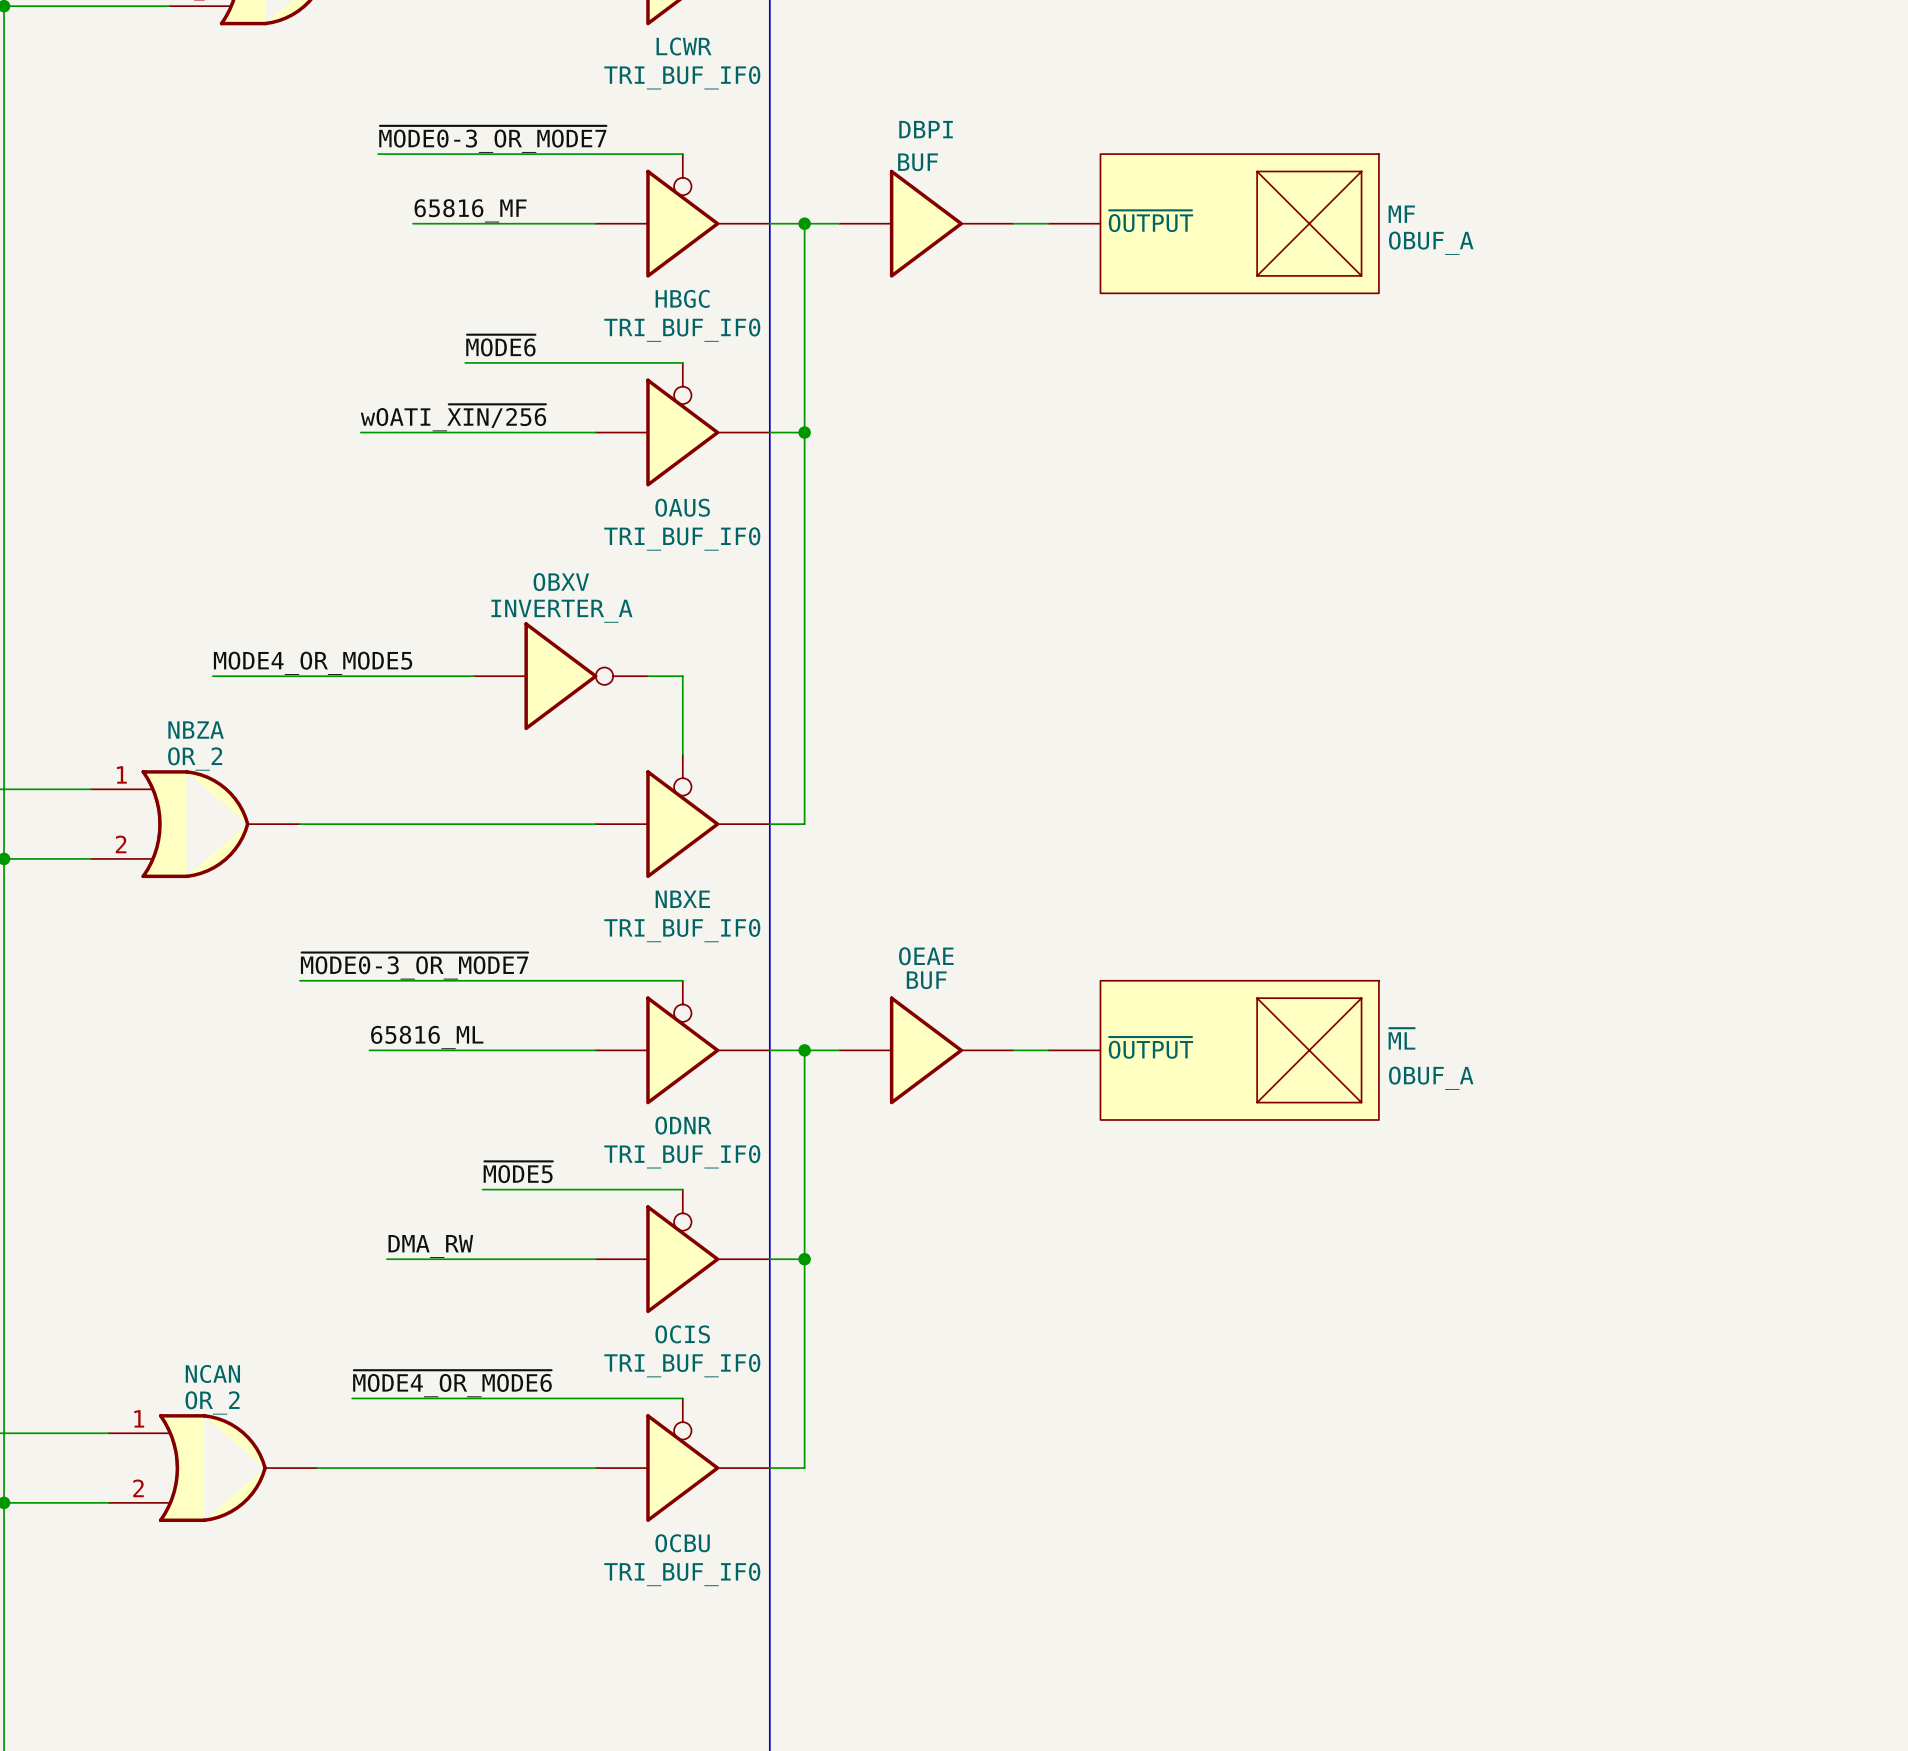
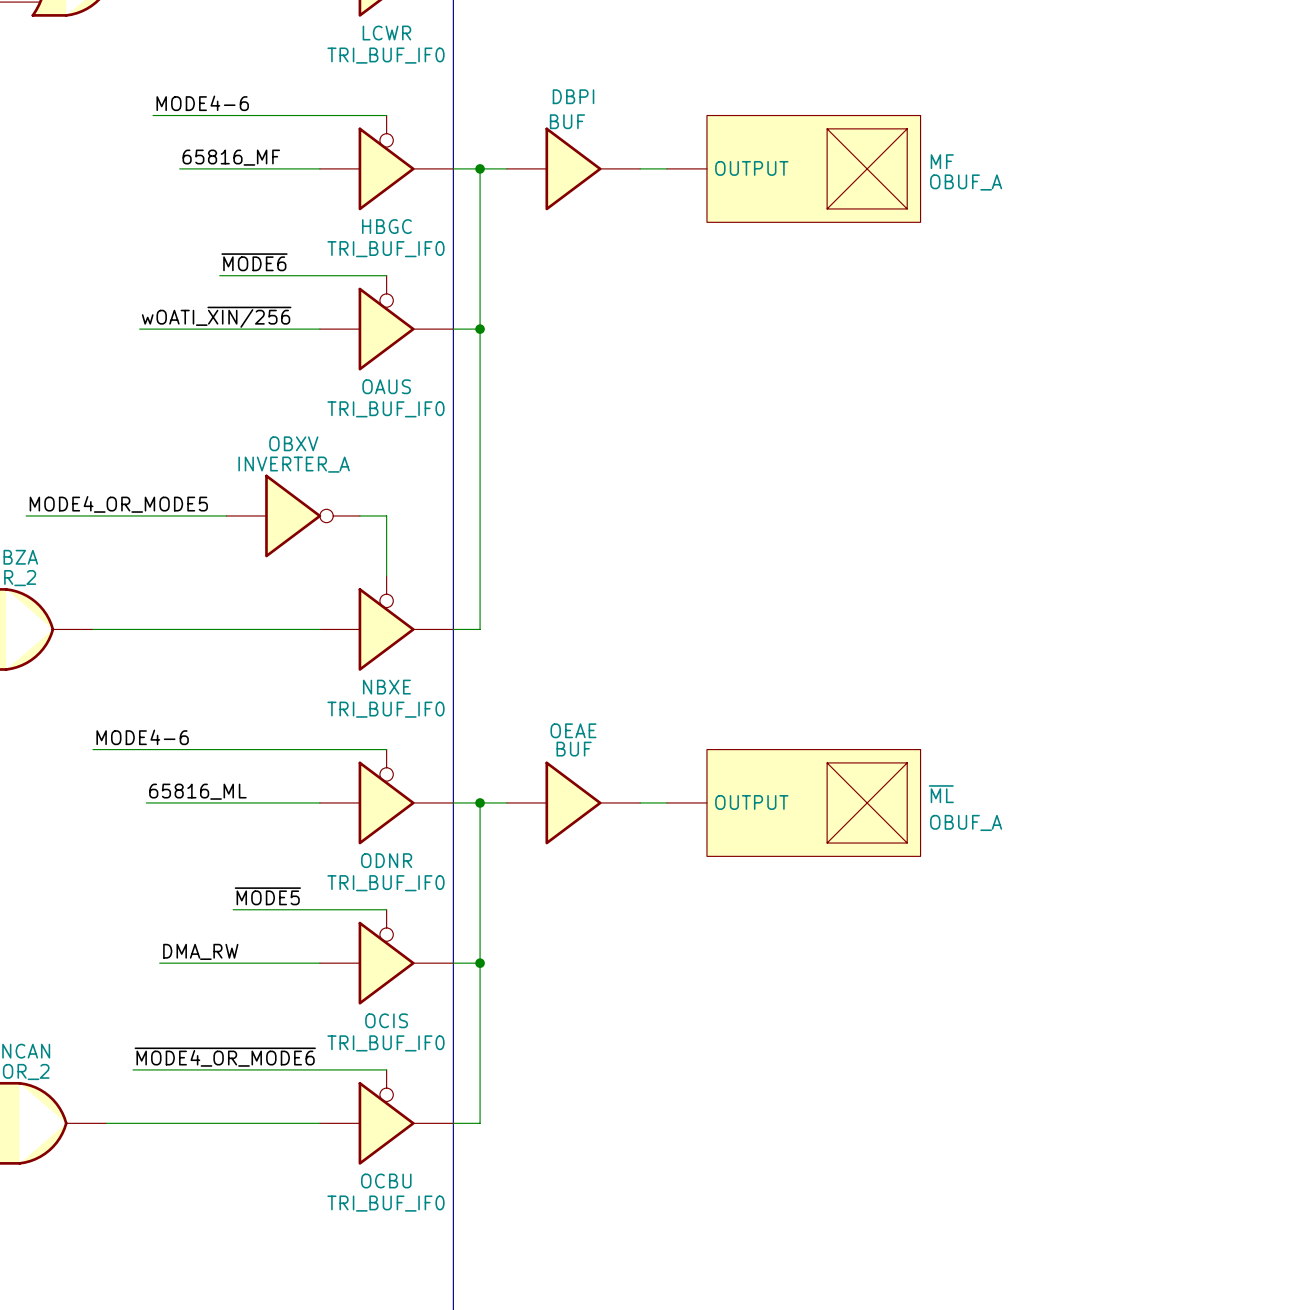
label: ~{MODE0-3_OR_MODE7} (492, 139) -> MODE4-6 (202, 103)
MF pin name: ~{OUTPUT} (1150, 221) -> OUTPUT (751, 168)
label: ~{MODE0-3_OR_MODE7} (414, 966) -> MODE4-6 (142, 737)
~{ML} pin name: ~{OUTPUT} (1150, 1047) -> OUTPUT (751, 802)

